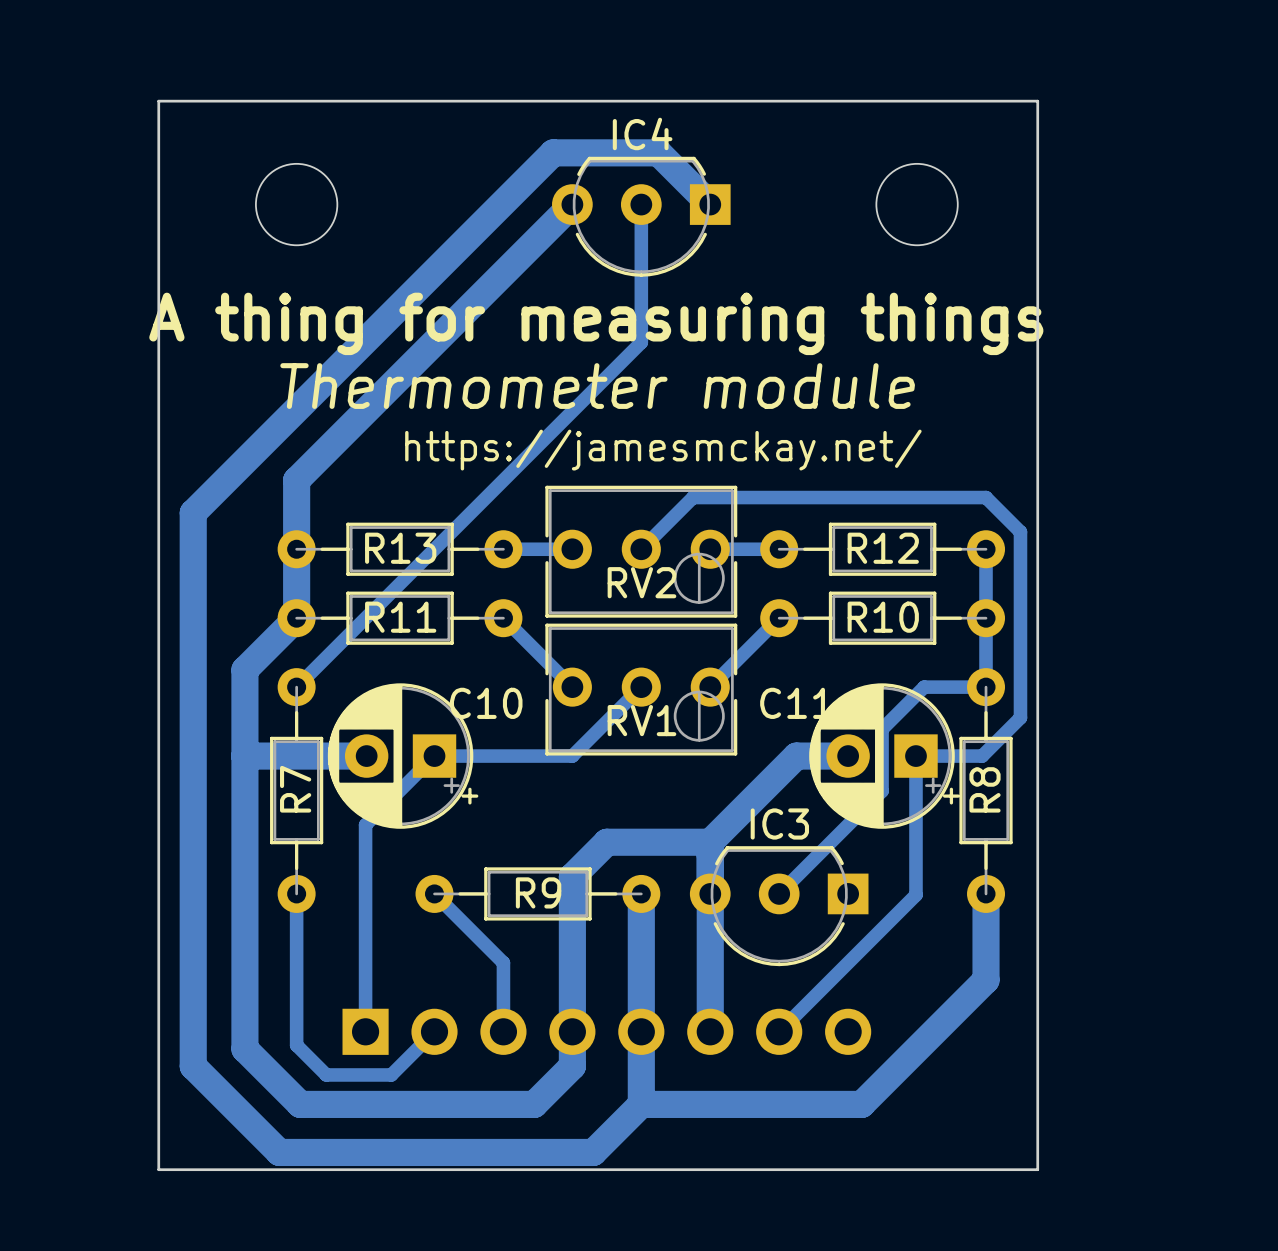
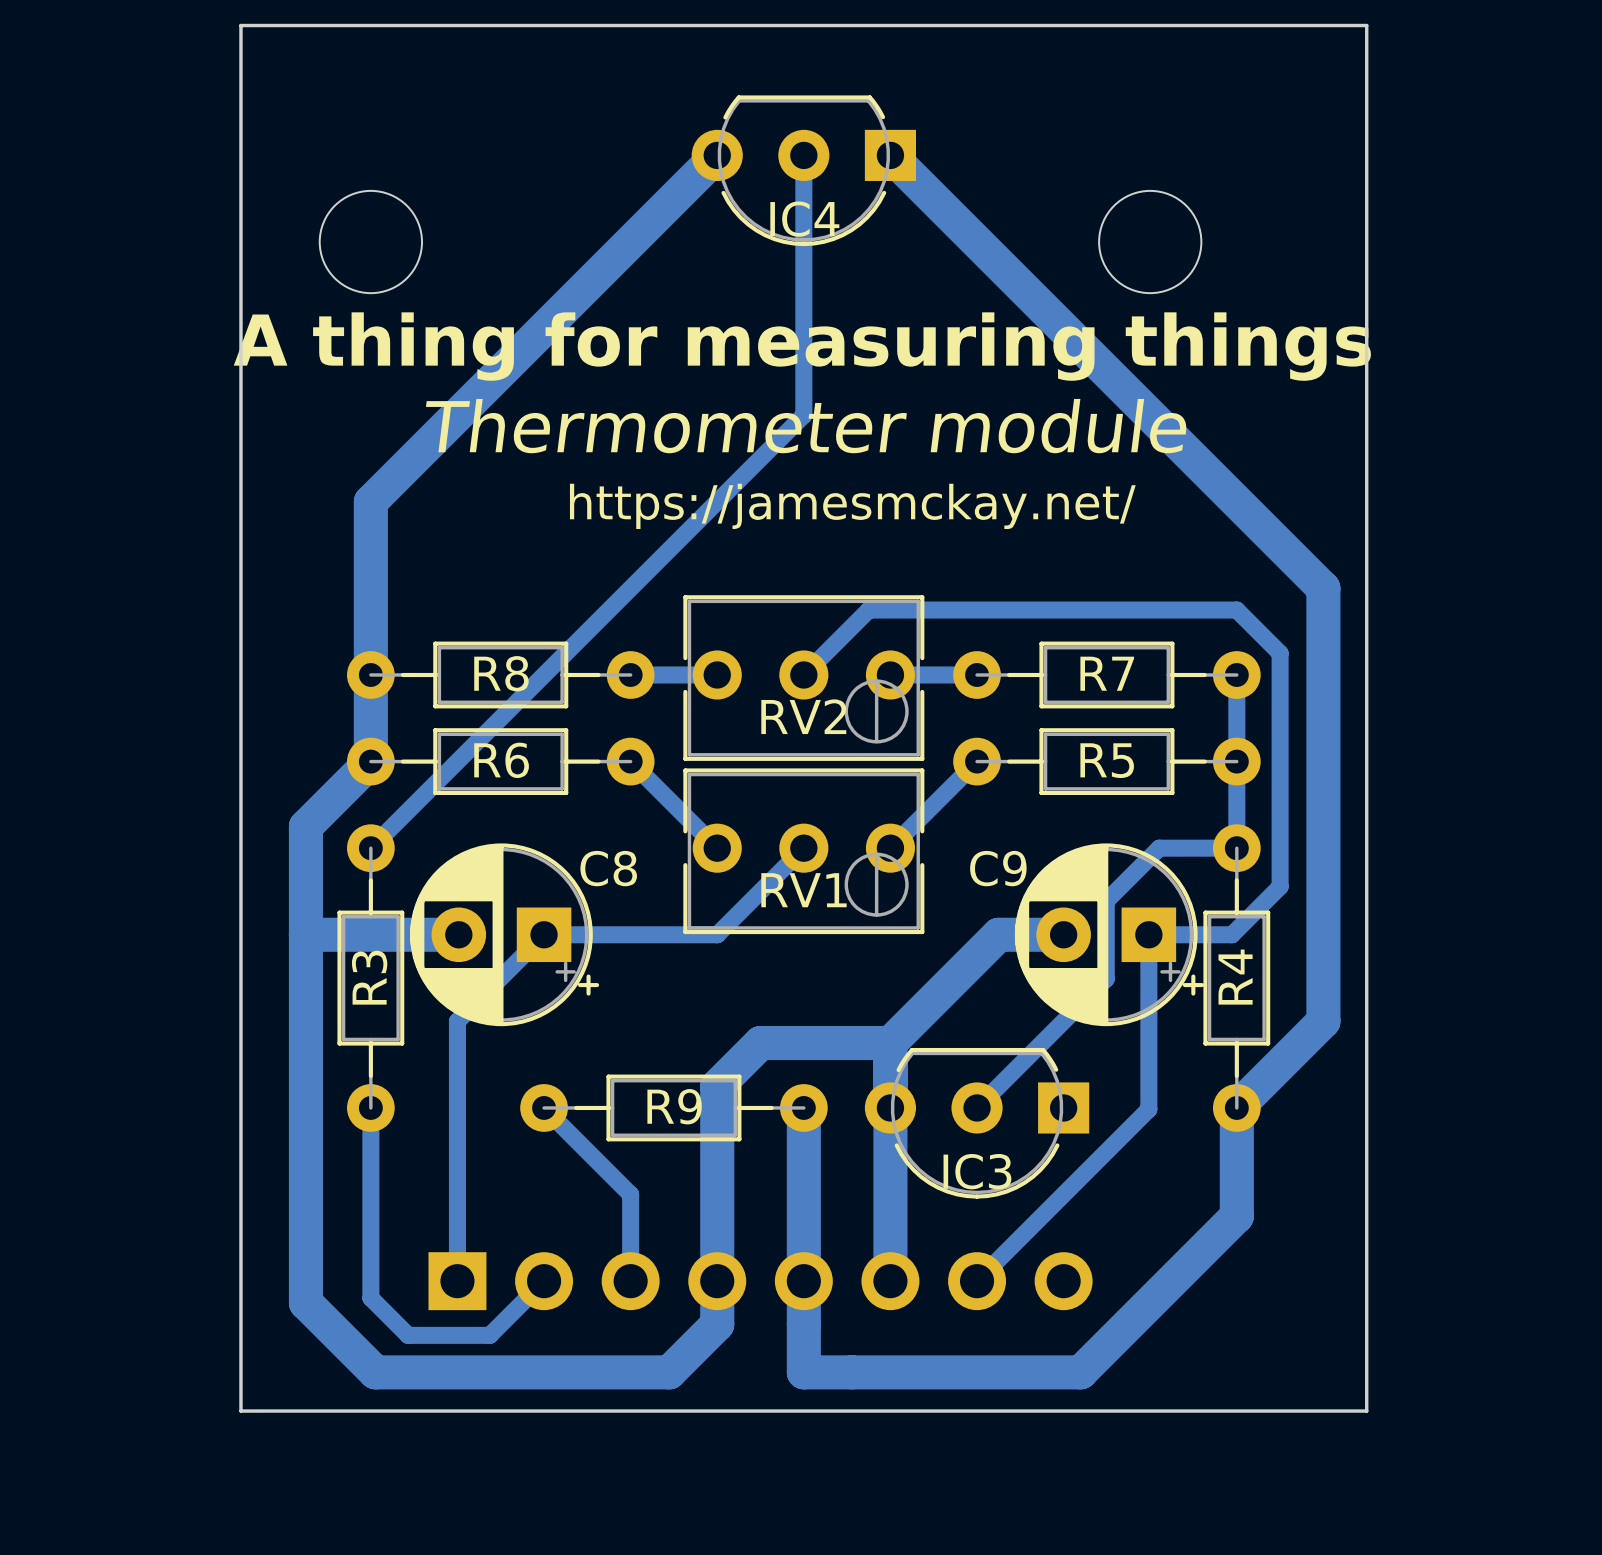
board edge: (158, 101) (1037, 101) (1037, 1169) (158, 1169) (158, 101) -> (240, 25) (240, 1411) (1366, 1411) (1366, 25) (240, 25)
IC4 name position: IC4 (642, 133) -> IC4 (804, 219)
bottom track: none -> (803, 155) (803, 242)
bottom track: none -> (890, 155) (1323, 588) (1323, 1021) (1236, 1107)
bottom track: (572, 204) (296, 480) -> (717, 155) (370, 501) (370, 588)
bottom track: (710, 204) (658, 152) (553, 152) (193, 512) (193, 1066) (279, 1152) (593, 1152) (641, 1104) -> none
IC4 position: (641, 216) -> (803, 170)
text position: A thing for measuring things (596, 323) -> A thing for measuring things (802, 346)
text position: Thermometer module (597, 386) -> Thermometer module (806, 426)
text position: https://jamesmckay.net/ (663, 450) -> https://jamesmckay.net/ (852, 506)
R13 name: R13 (400, 548) -> R8 (501, 673)
R12 name: R12 (883, 548) -> R7 (1107, 673)
R11 name: R11 (400, 617) -> R6 (501, 760)
R10 name: R10 (883, 617) -> R5 (1107, 760)
C10 name: C10 (486, 703) -> C8 (608, 868)
C11 name: C11 (796, 703) -> C9 (998, 868)
R7 name: R7 (295, 789) -> R3 (369, 977)
R8 name: R8 (985, 789) -> R4 (1235, 977)
IC3 name position: IC3 (779, 823) -> IC3 (977, 1171)

